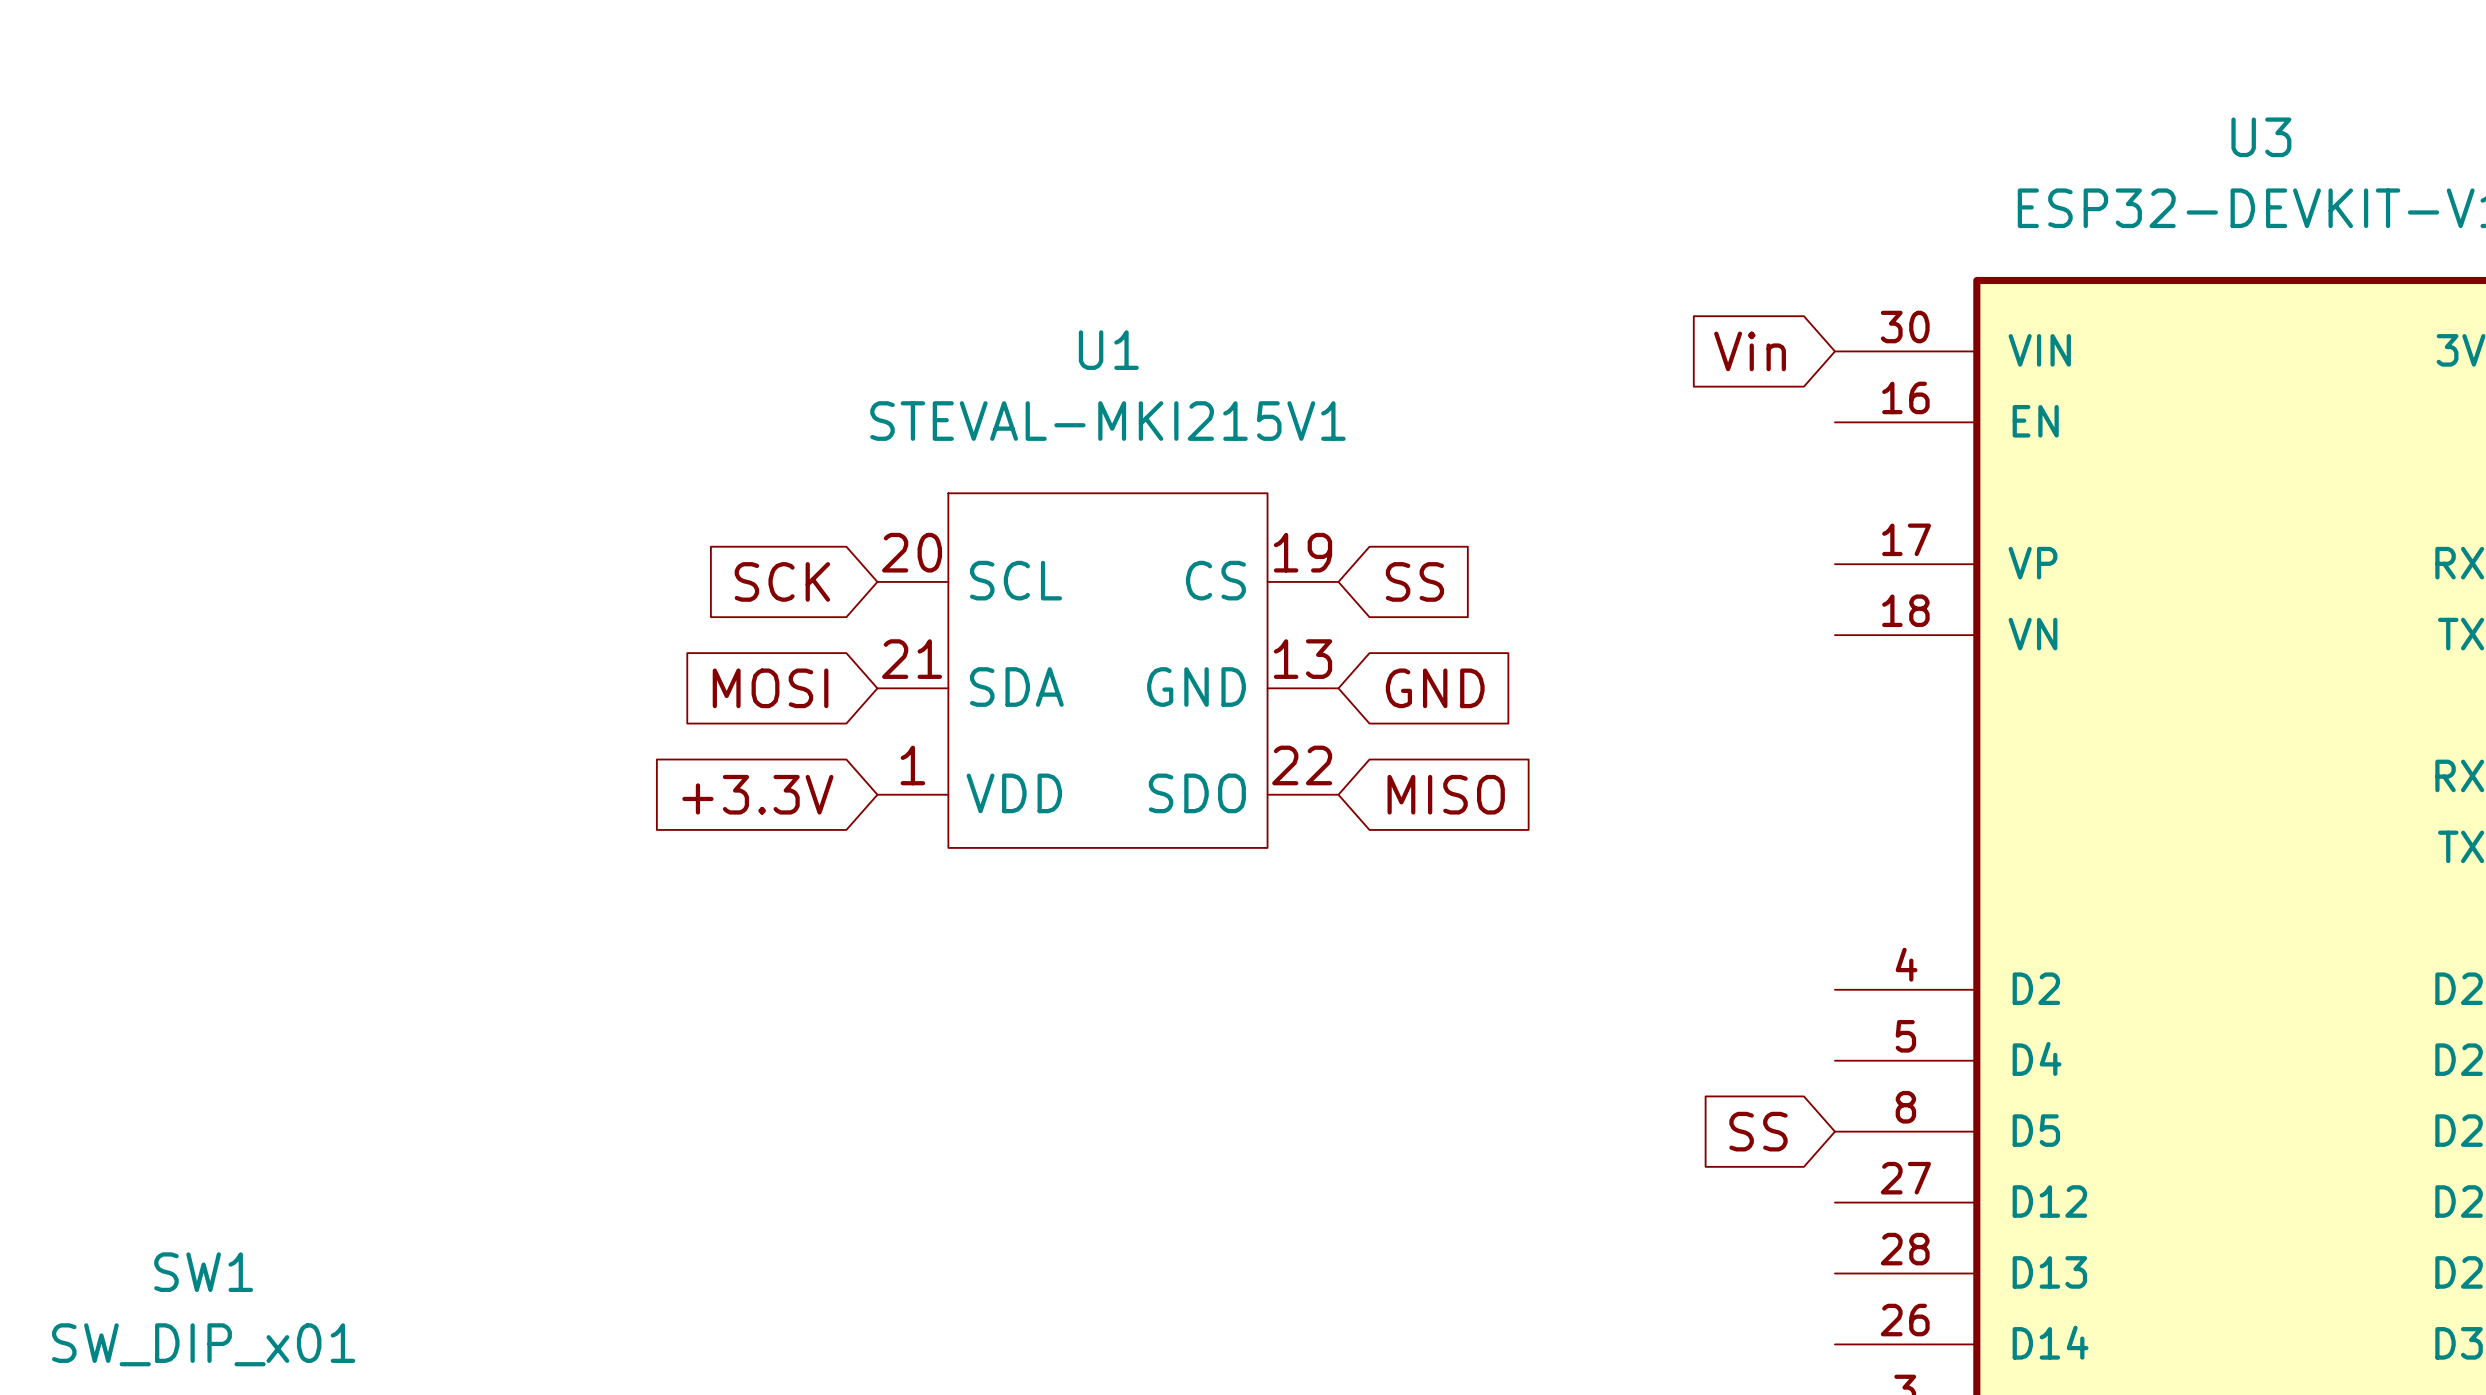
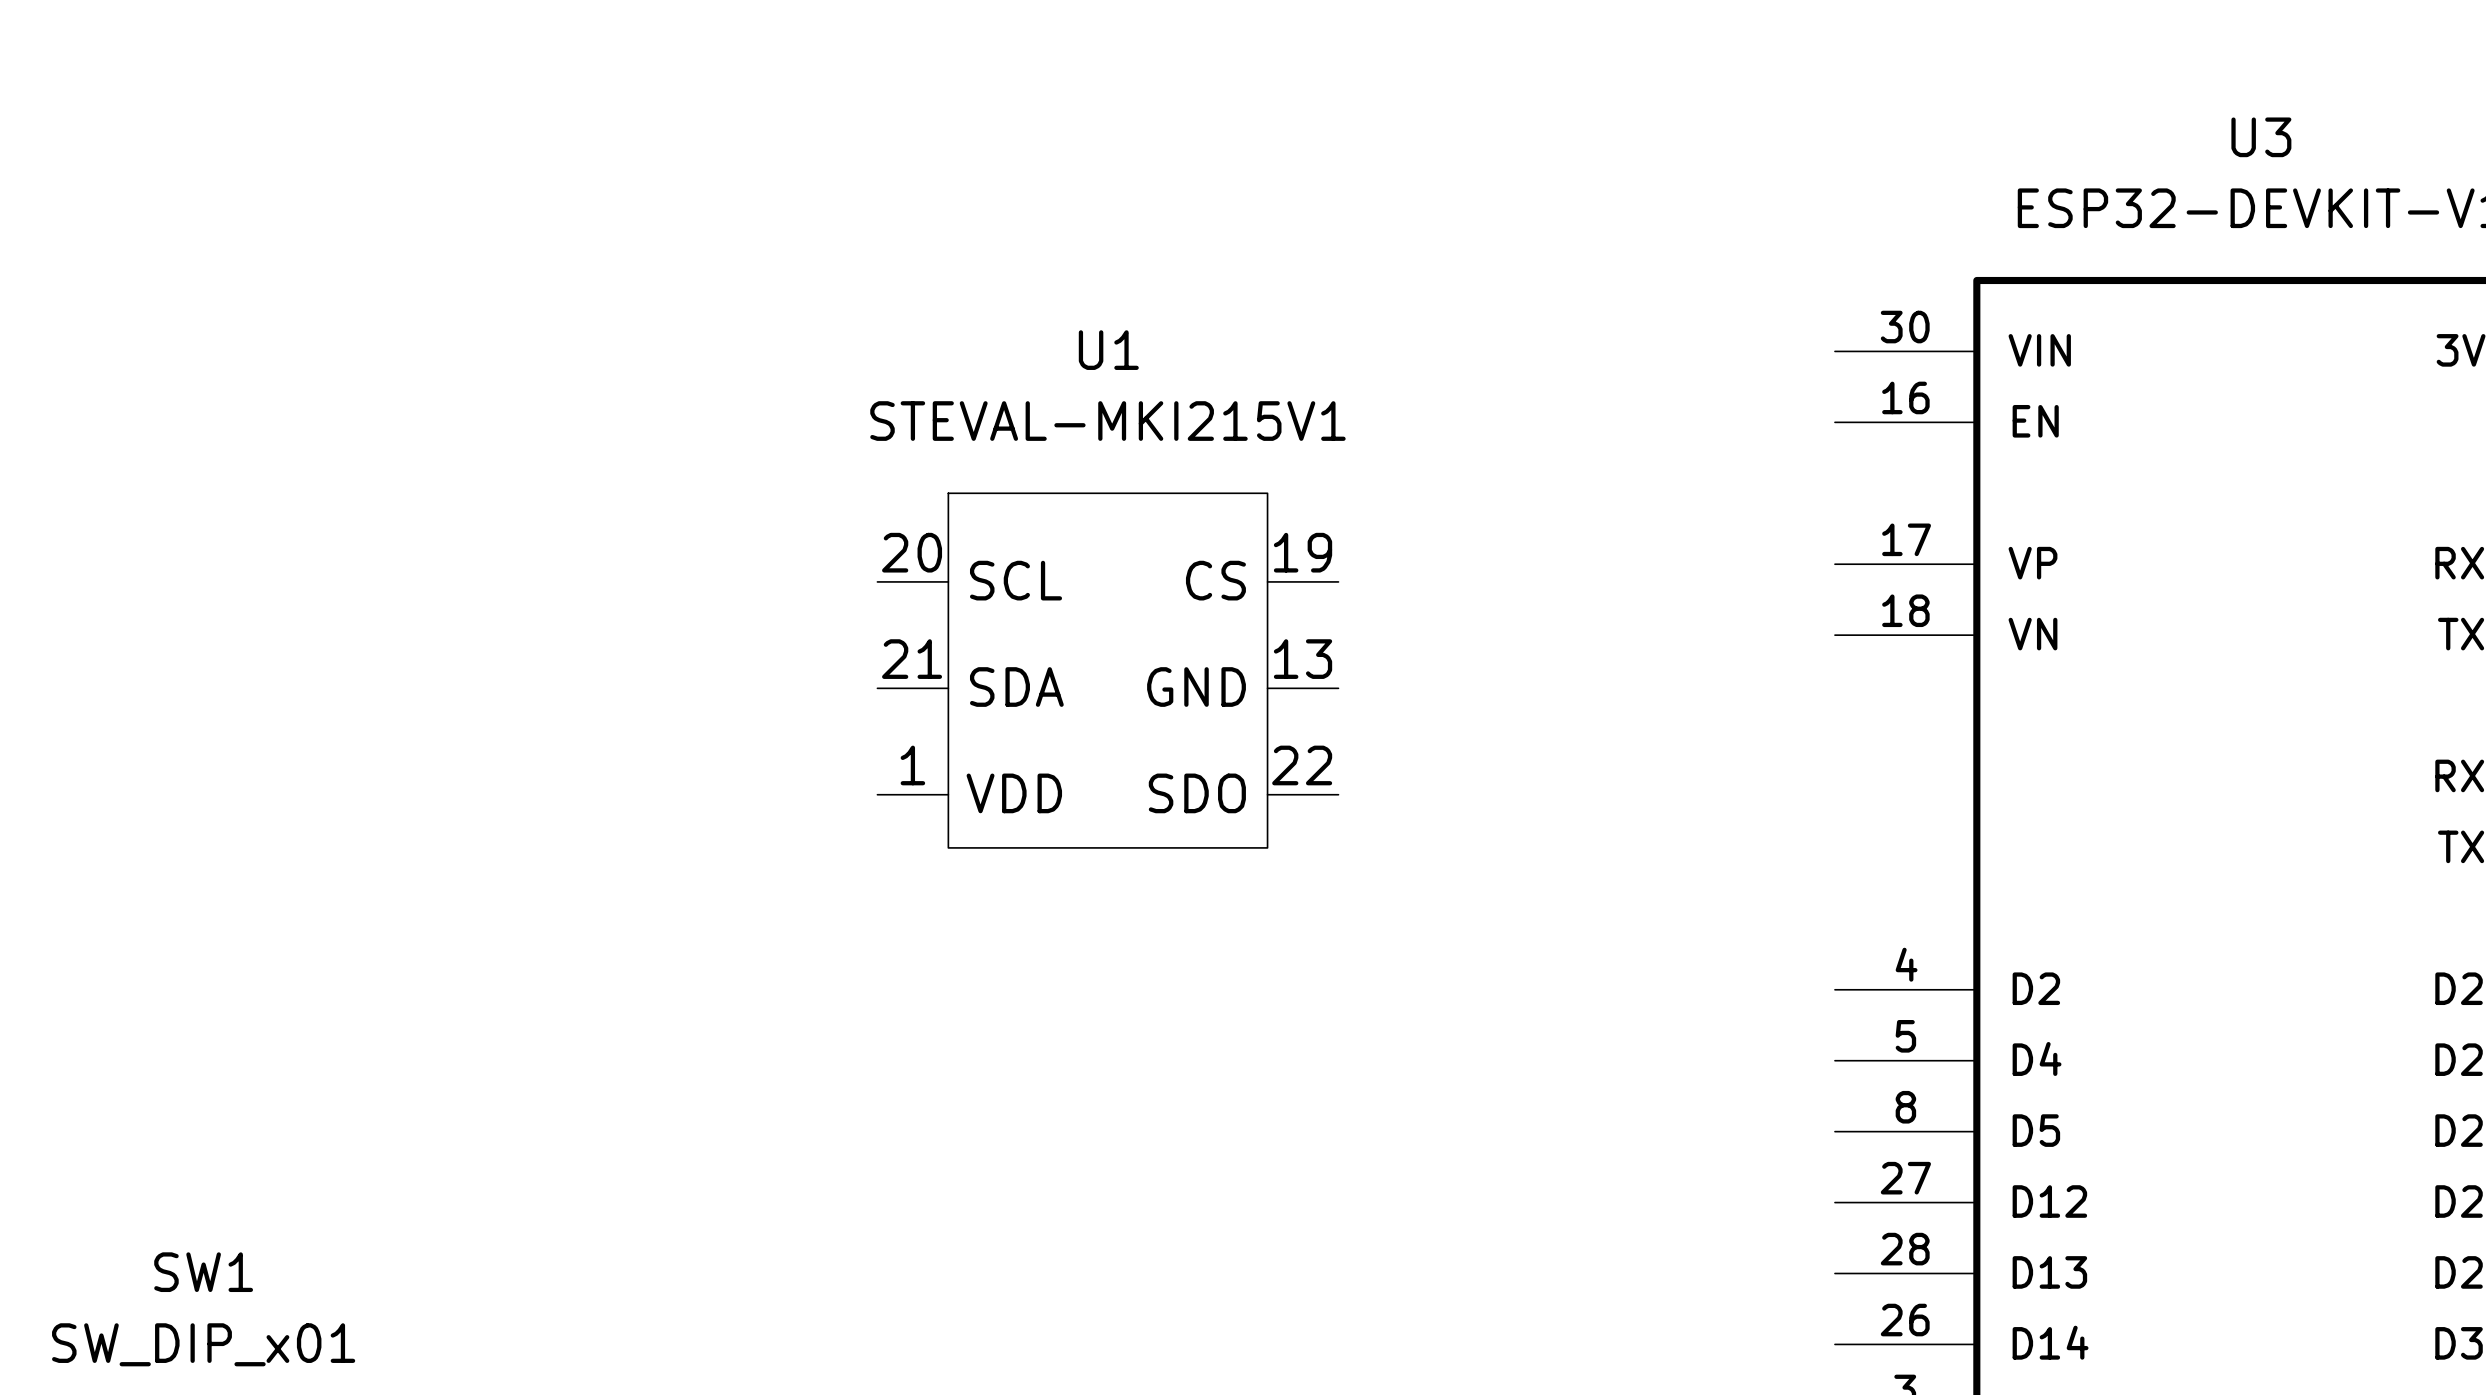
global label: Vin (1750, 351) -> none
global label: SCK (782, 581) -> none
global label: SS (1414, 581) -> none
global label: MOSI (770, 688) -> none
global label: GND (1435, 688) -> none
global label: +3.3V (757, 794) -> none
global label: MISO (1446, 794) -> none
global label: SS (1758, 1131) -> none

